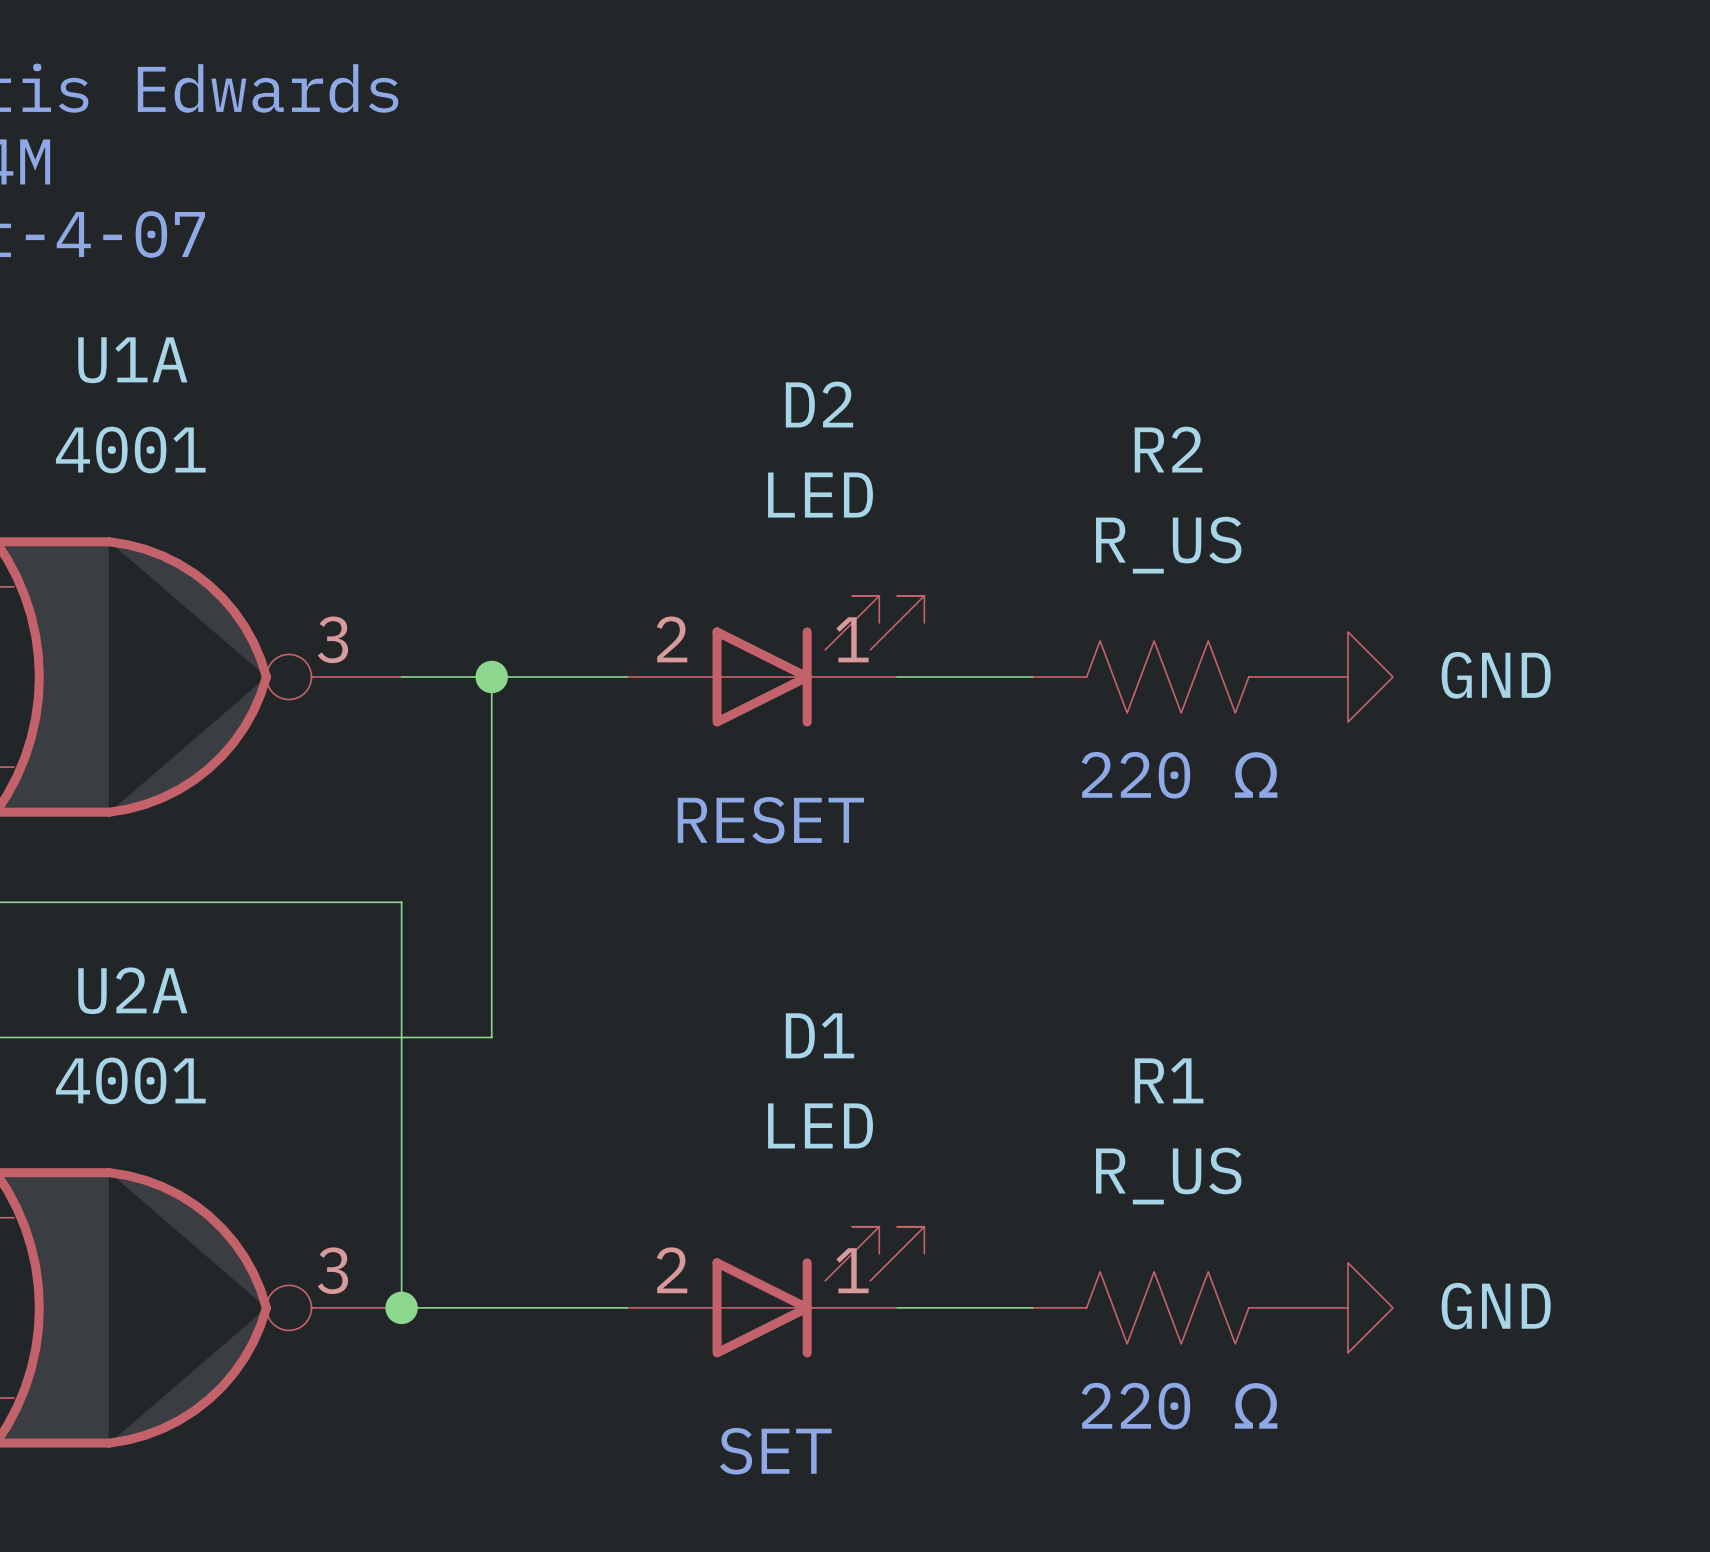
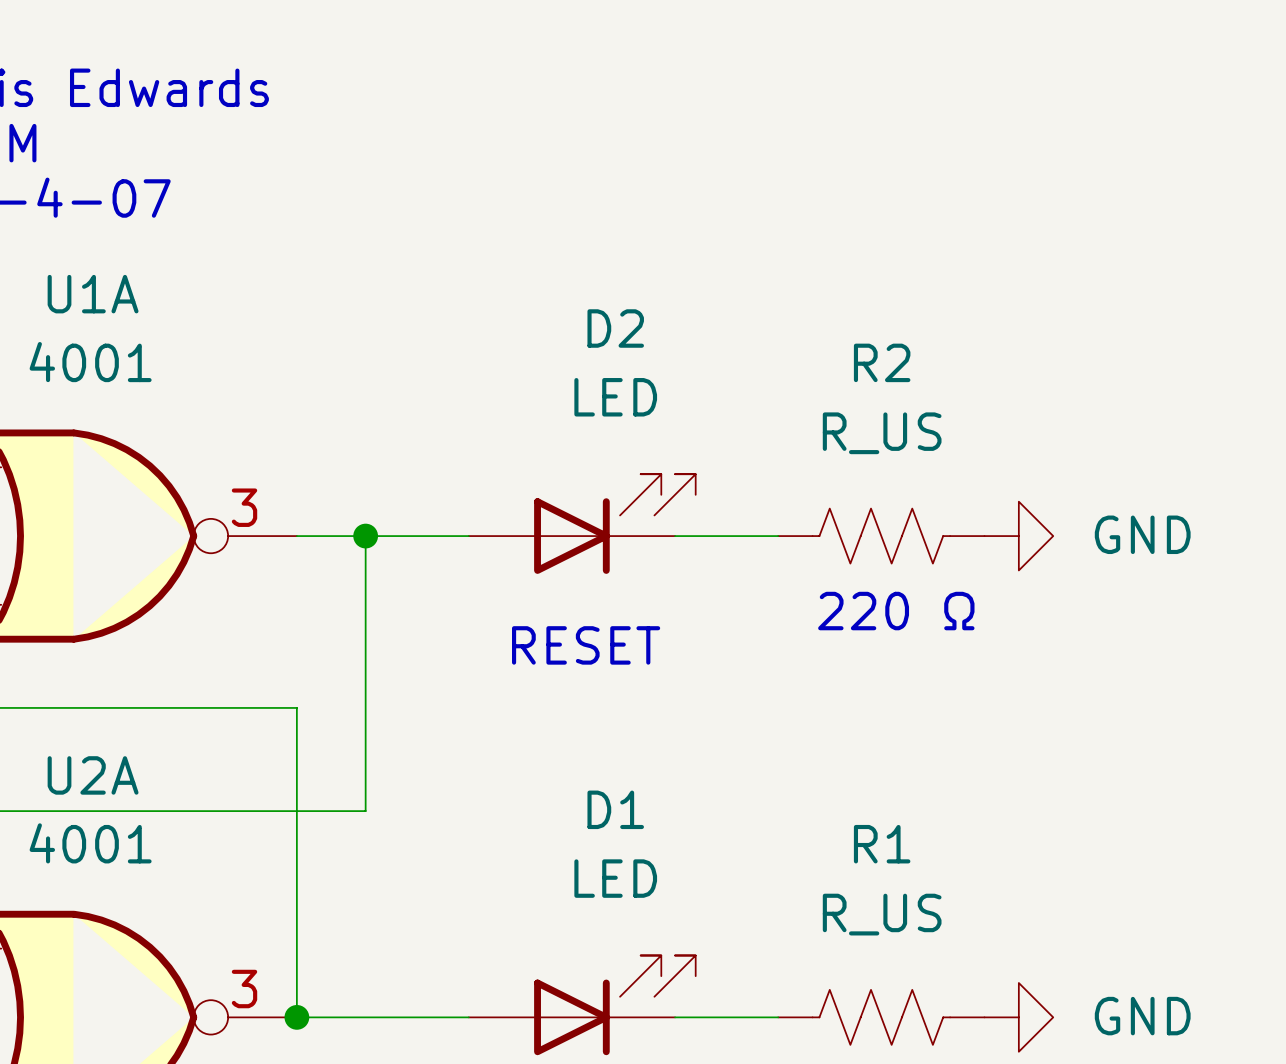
D2 pin number: 2 (672, 639) -> none
D2 pin number: 1 (852, 639) -> none
D1 pin number: 2 (672, 1270) -> none
D1 pin number: 1 (852, 1270) -> none

